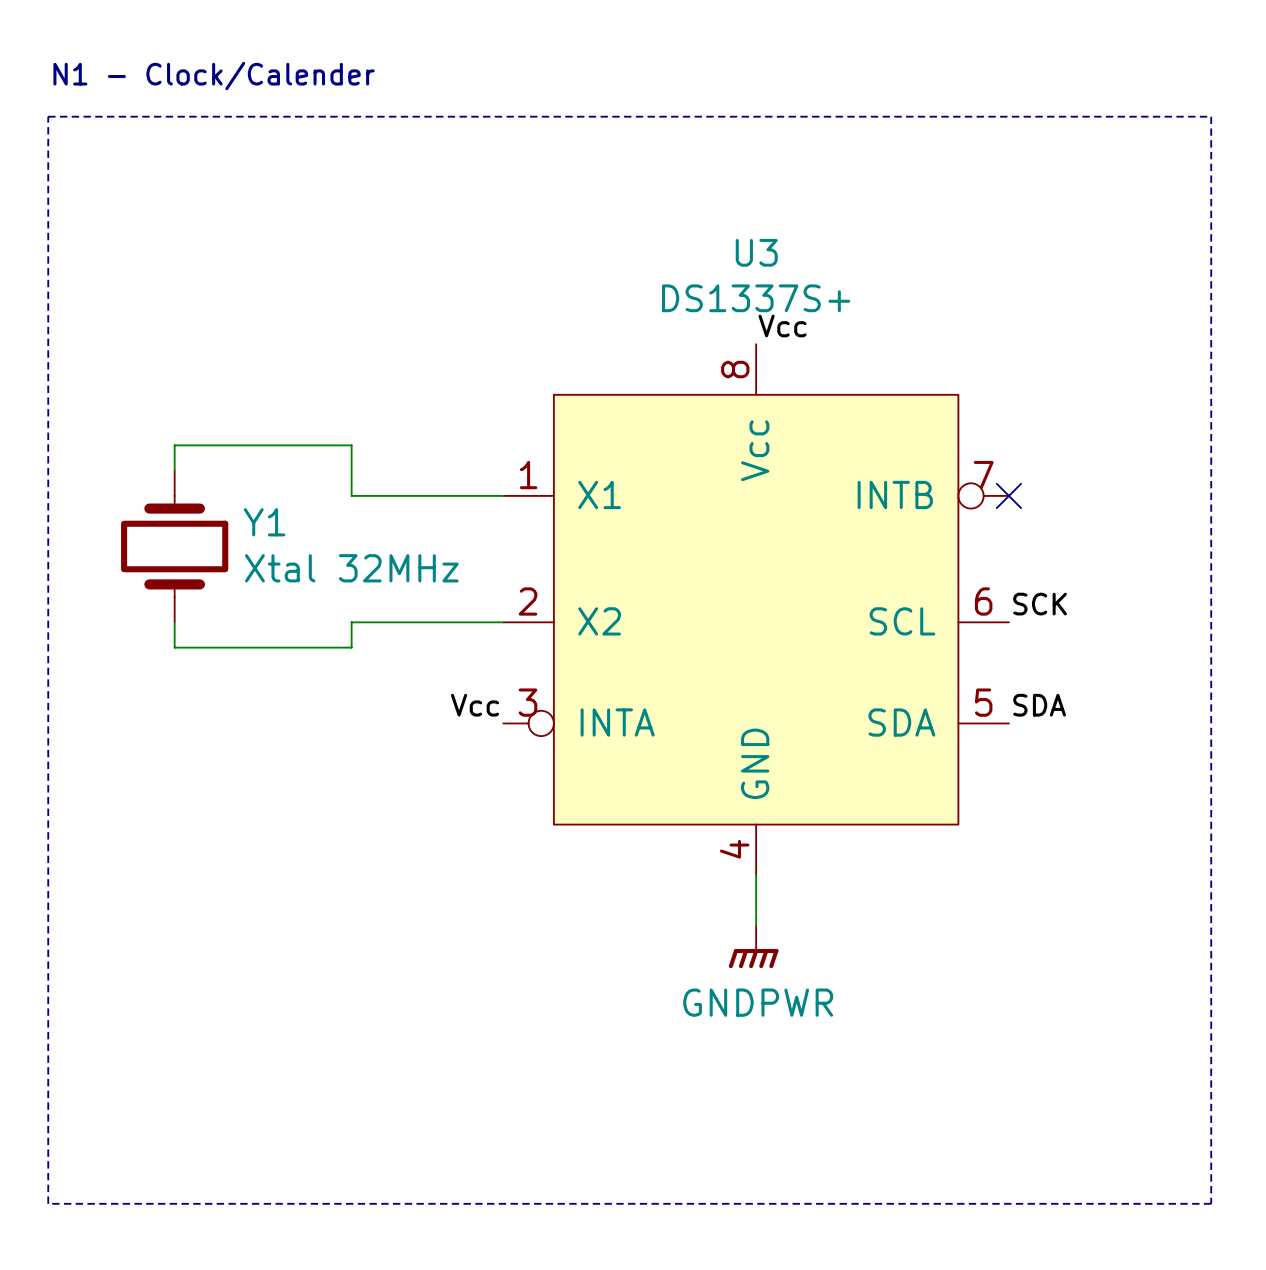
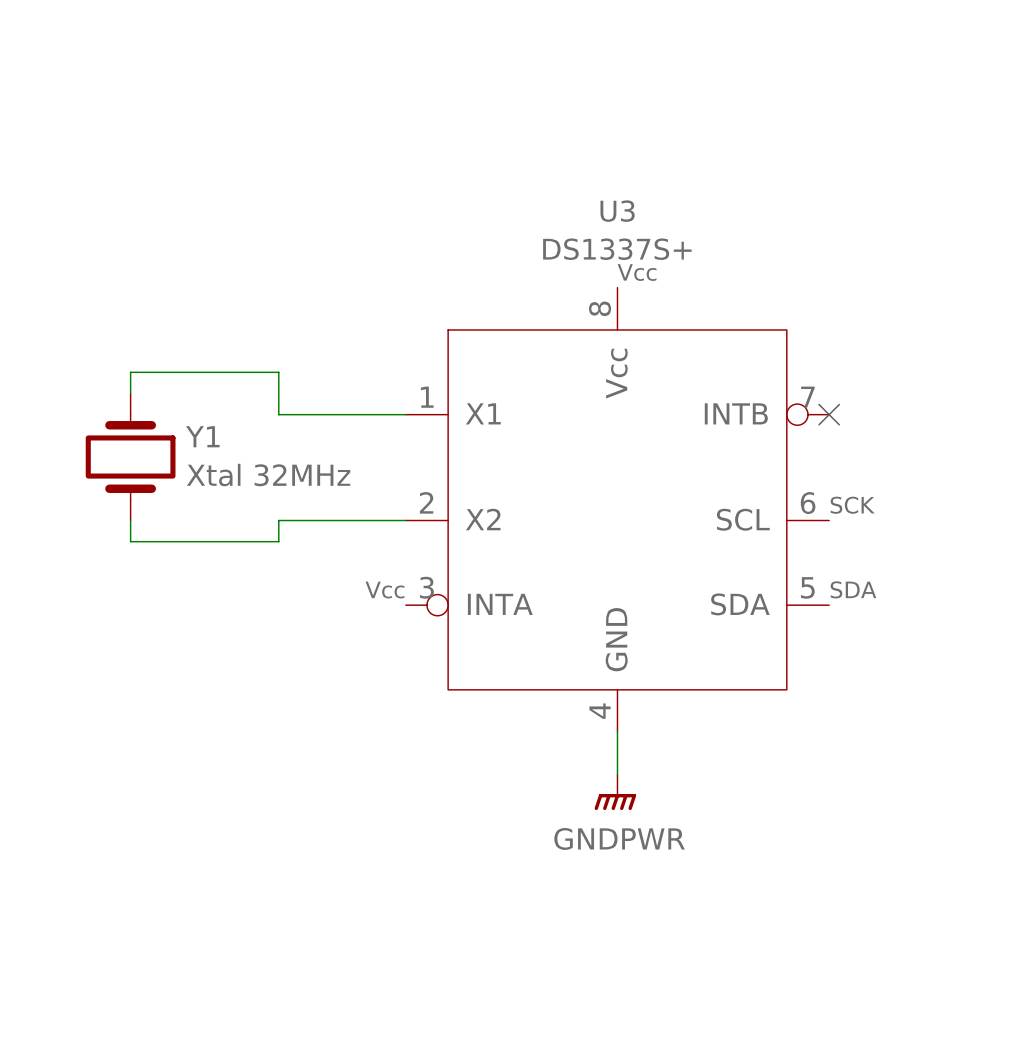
text: N1 - Clock/Calender (214, 76) -> none
line: (48, 116) (1211, 116) (1211, 1203) (48, 1203) (48, 116) -> none

